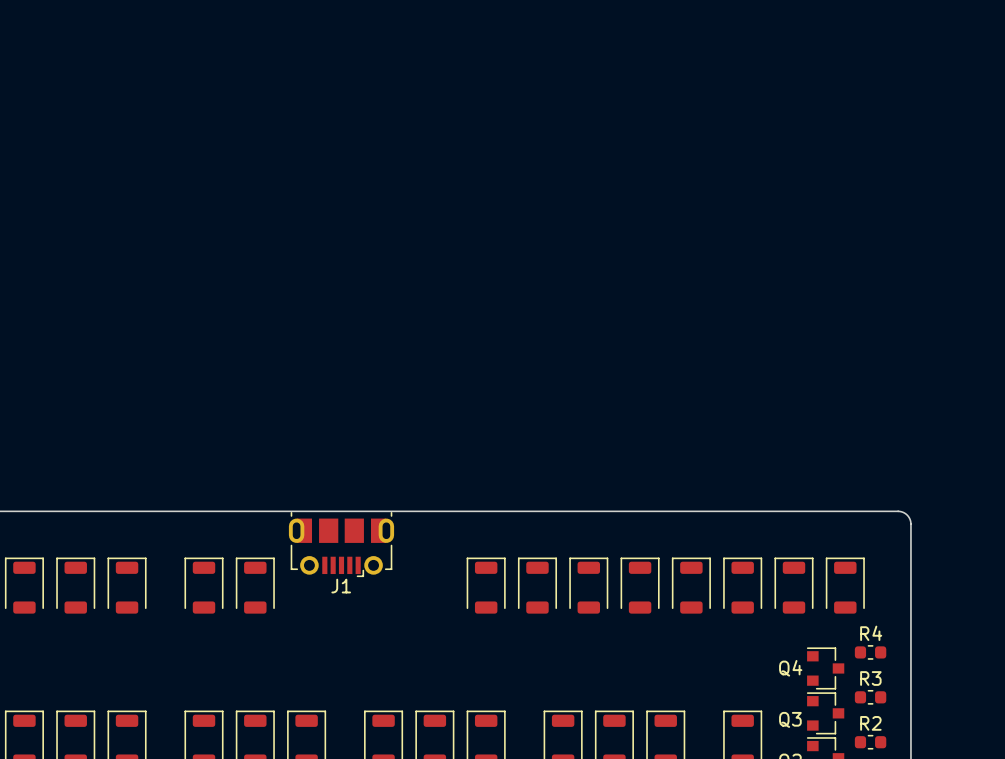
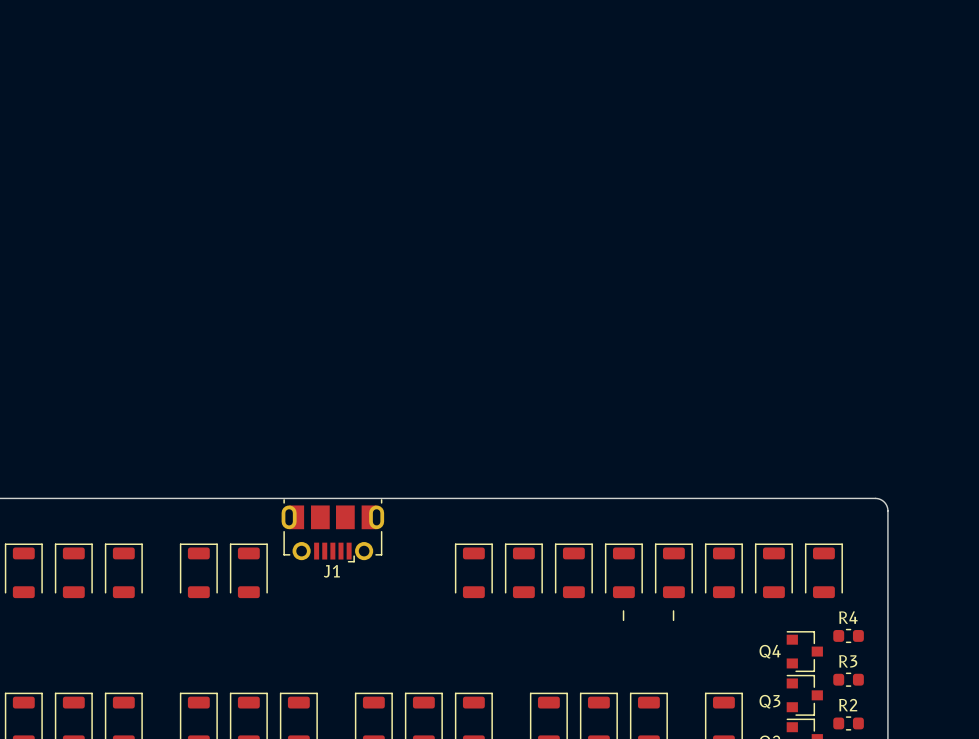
line: none -> (623, 610) (623, 620)
line: none -> (673, 610) (673, 620)

